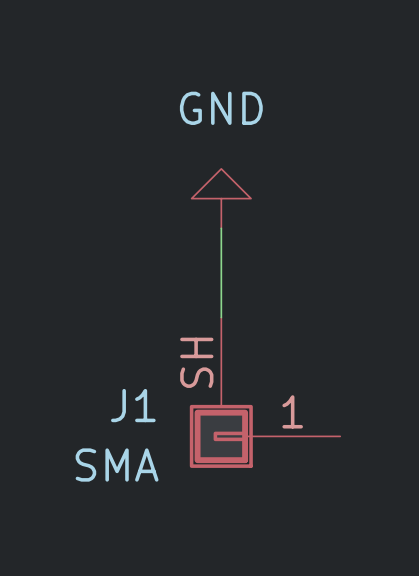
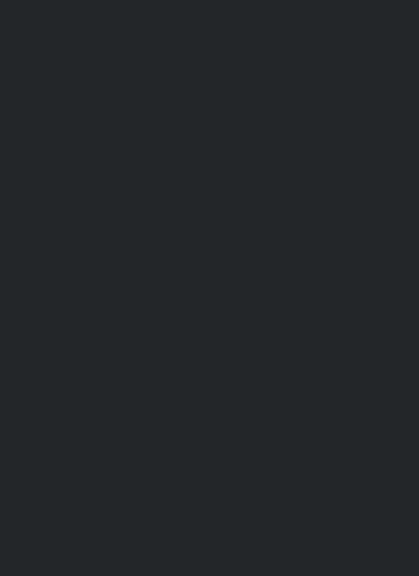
power symbol: GND (221, 198) -> none
wire: (221, 228) (221, 317) -> none
J1: SMA (265, 392) -> none

